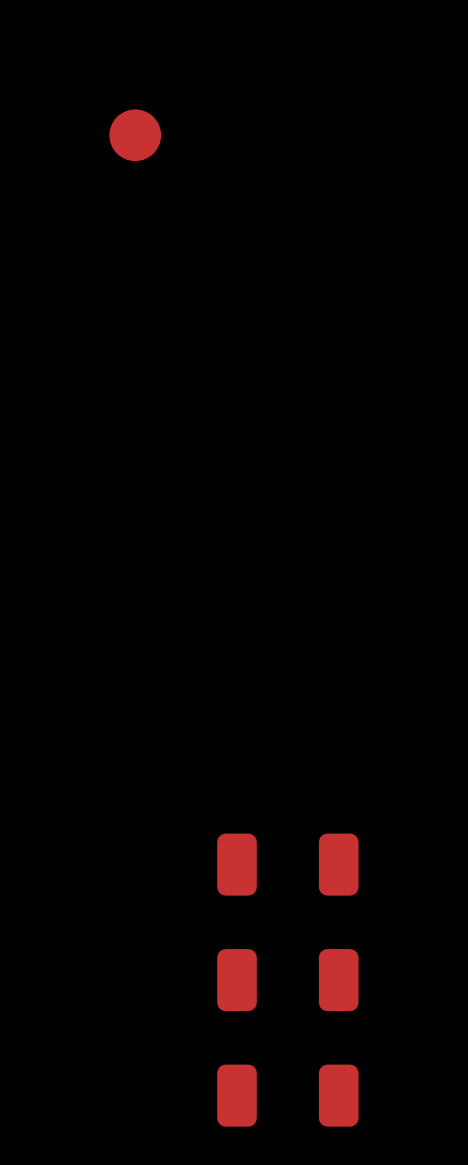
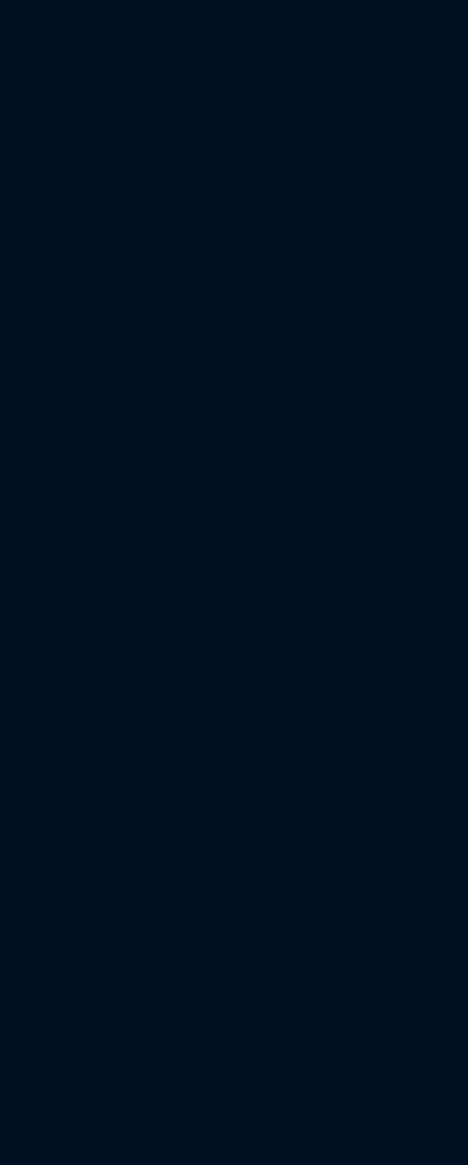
part: (135, 135) -> none
part: (287, 864) -> none
part: (287, 980) -> none
part: (287, 1095) -> none

